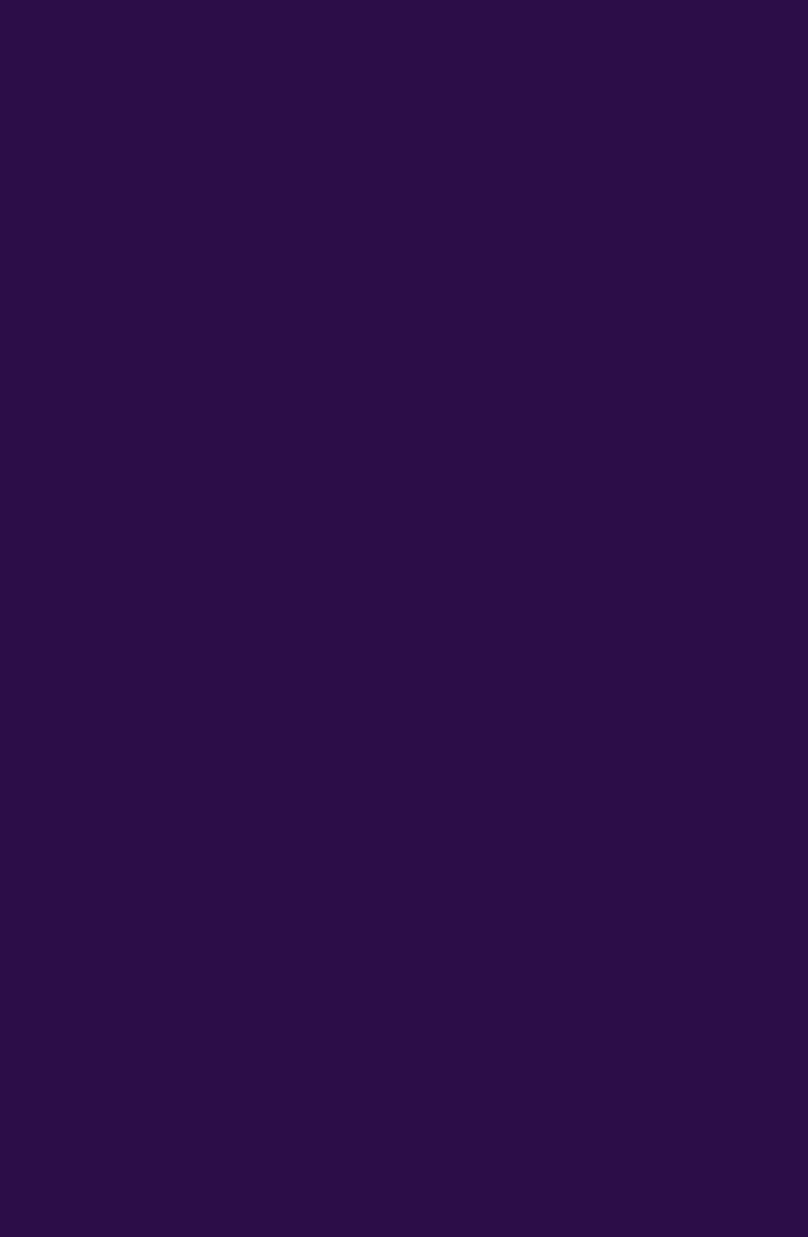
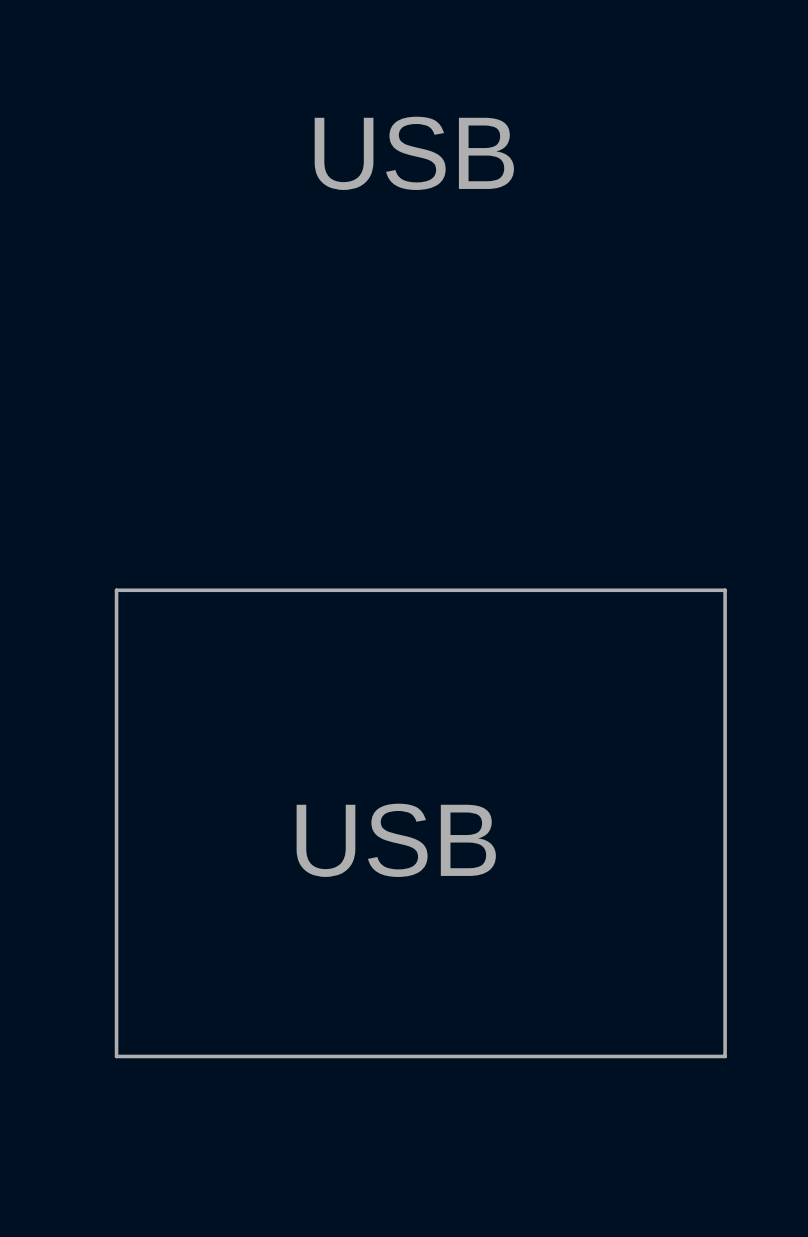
text: none -> USB (414, 153)
line: none -> (116, 590) (725, 590) (725, 1056) (116, 1056) (116, 590)
text: none -> USB (396, 840)

